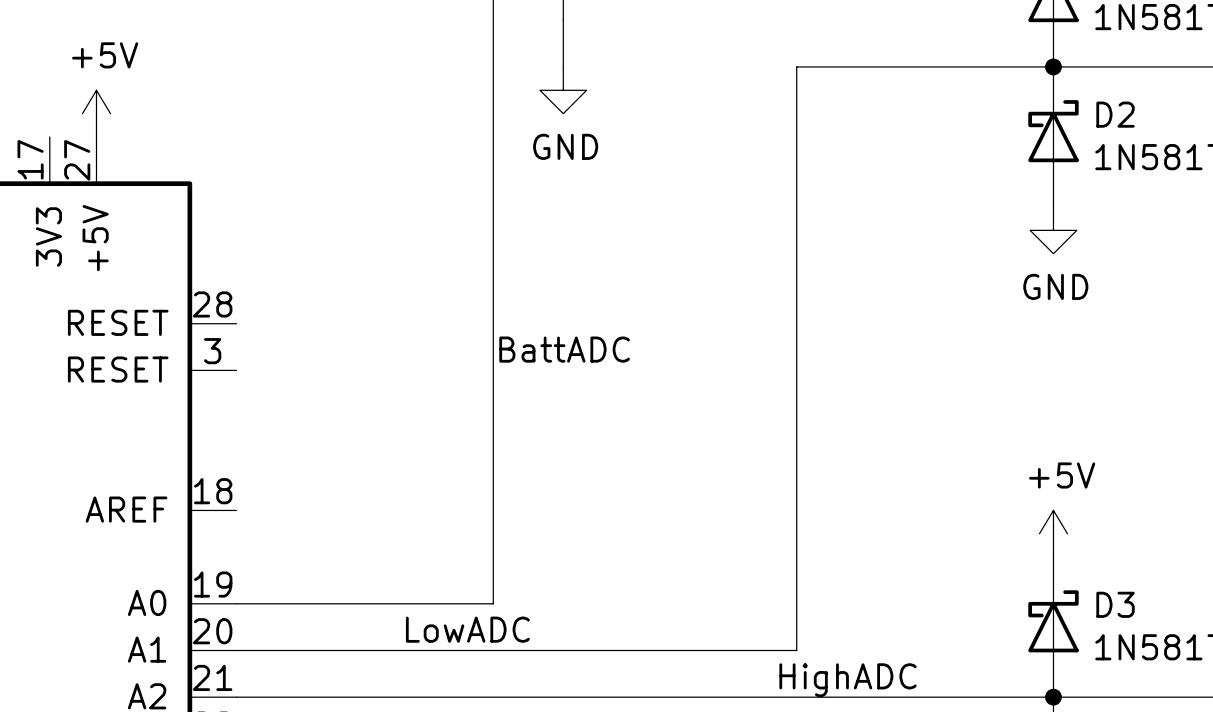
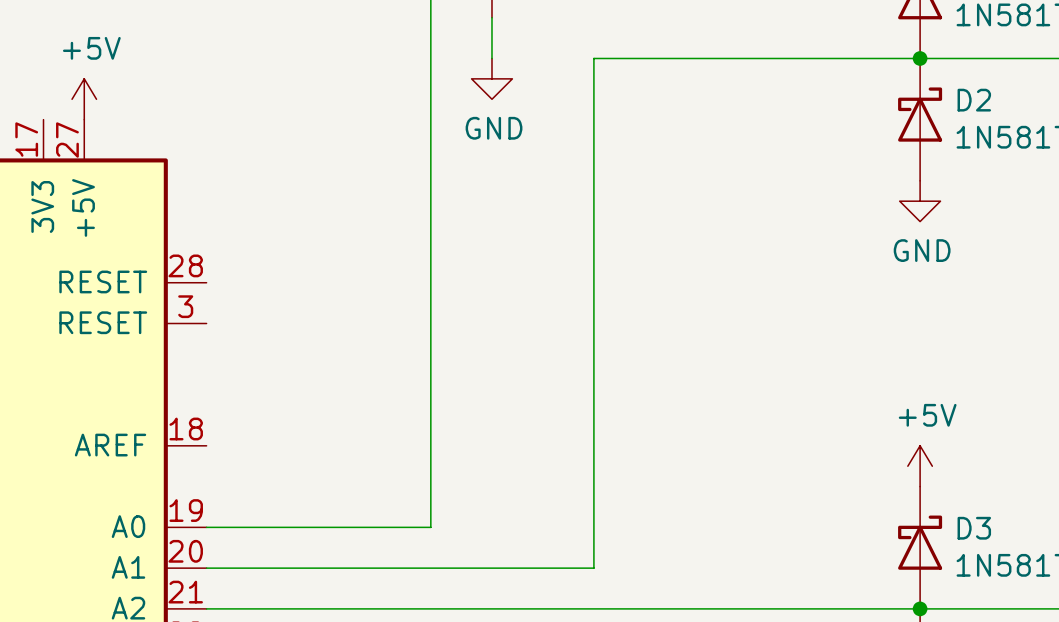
wire: (796, 66) (796, 650) (680, 650) -> (695, 58) (593, 58) (593, 568)
label: BattADC (564, 349) -> none
label: LowADC (467, 629) -> none
label: HighADC (848, 680) -> none

